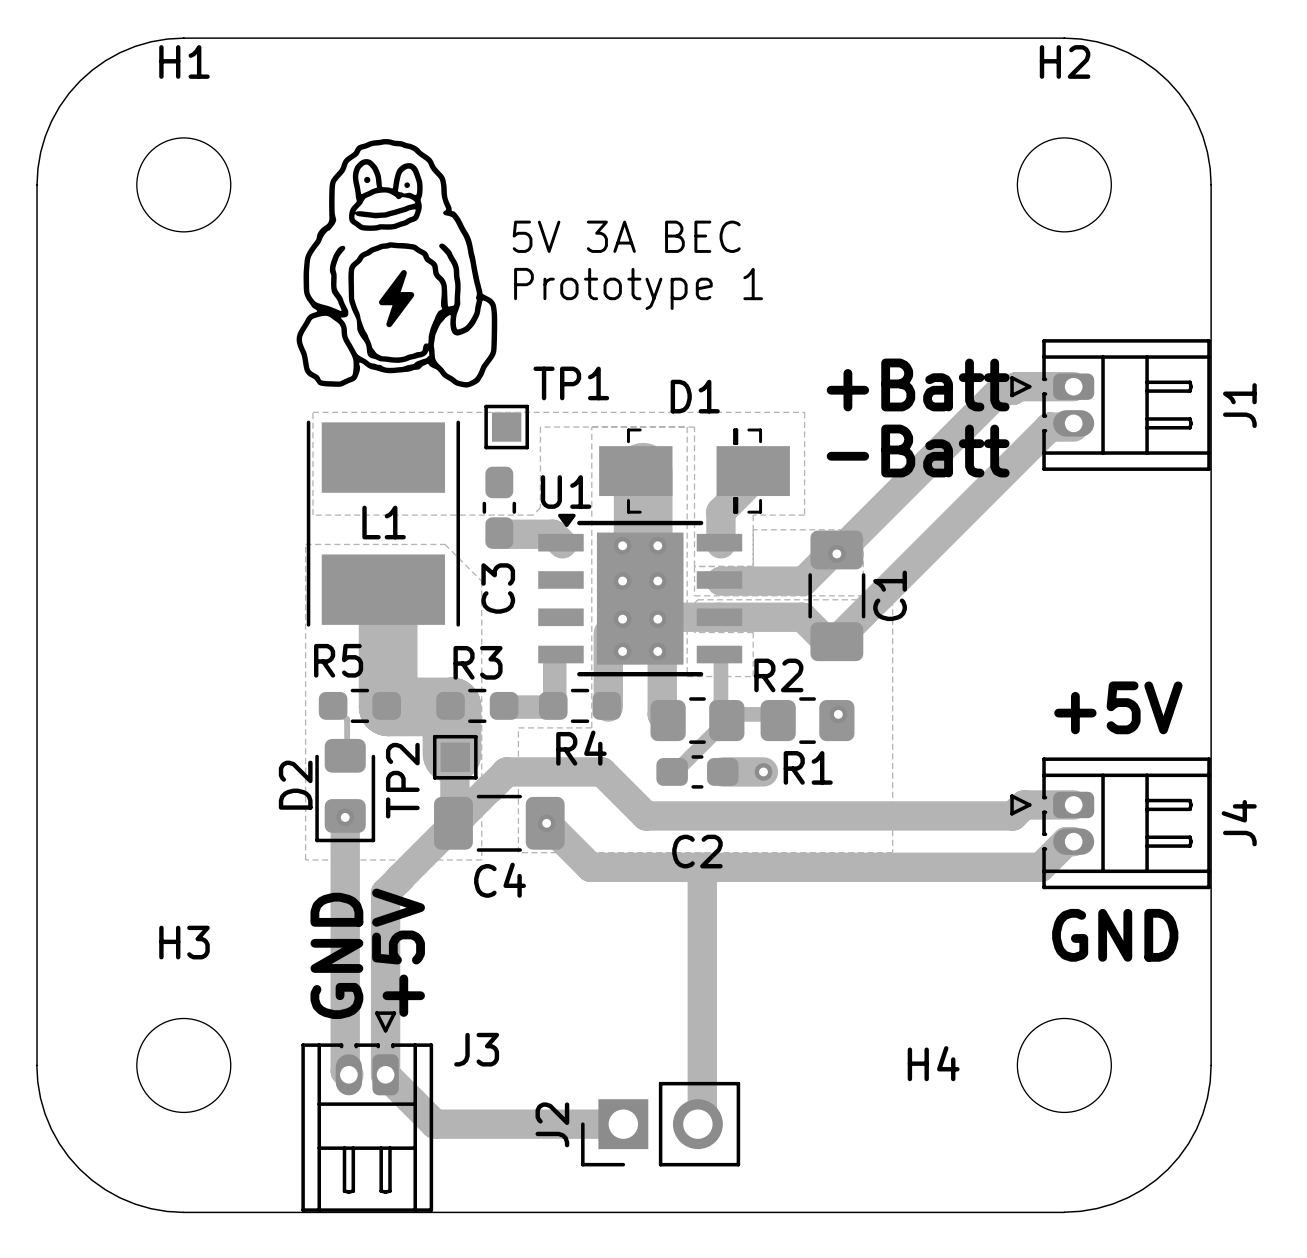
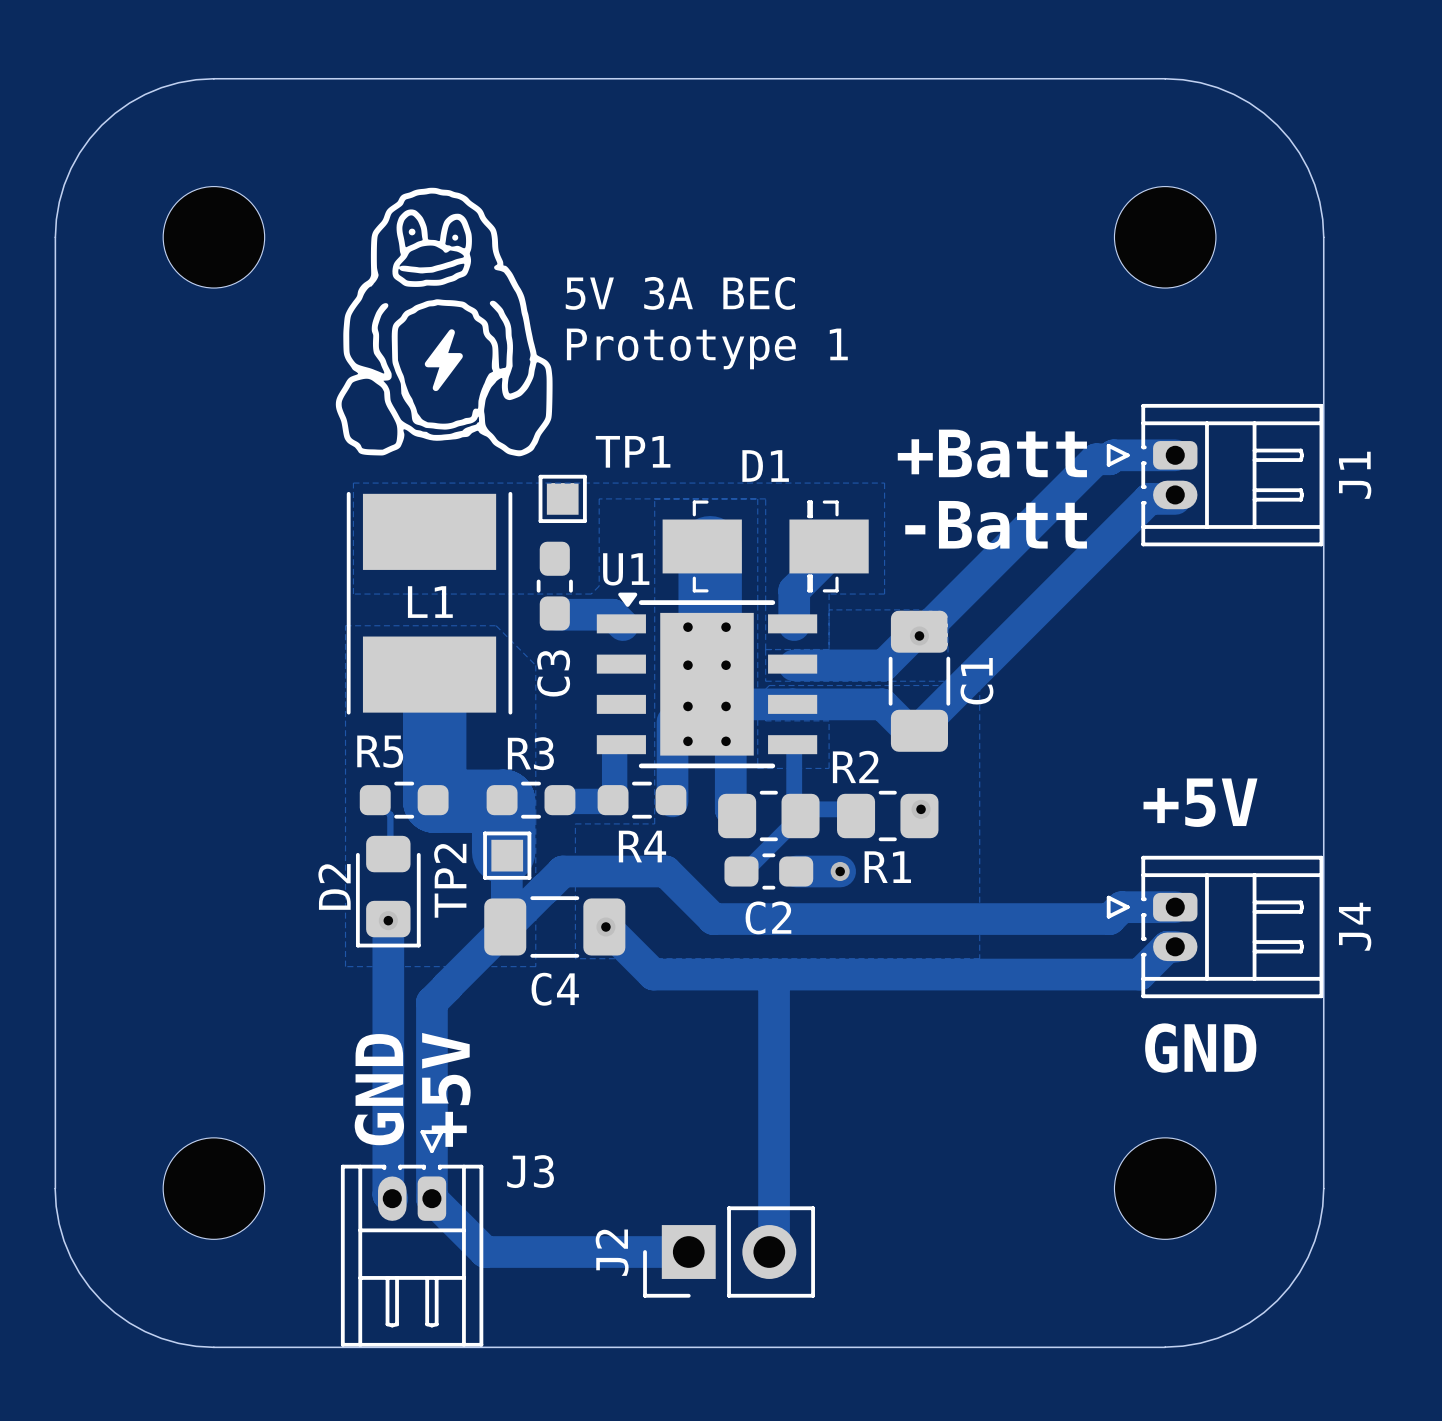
H1 name: H1 (184, 61) -> none
H2 name: H2 (1065, 61) -> none
C2 name position: C2 (697, 851) -> C2 (768, 917)
H3 name: H3 (184, 942) -> none
H4 name: H4 (933, 1063) -> none

